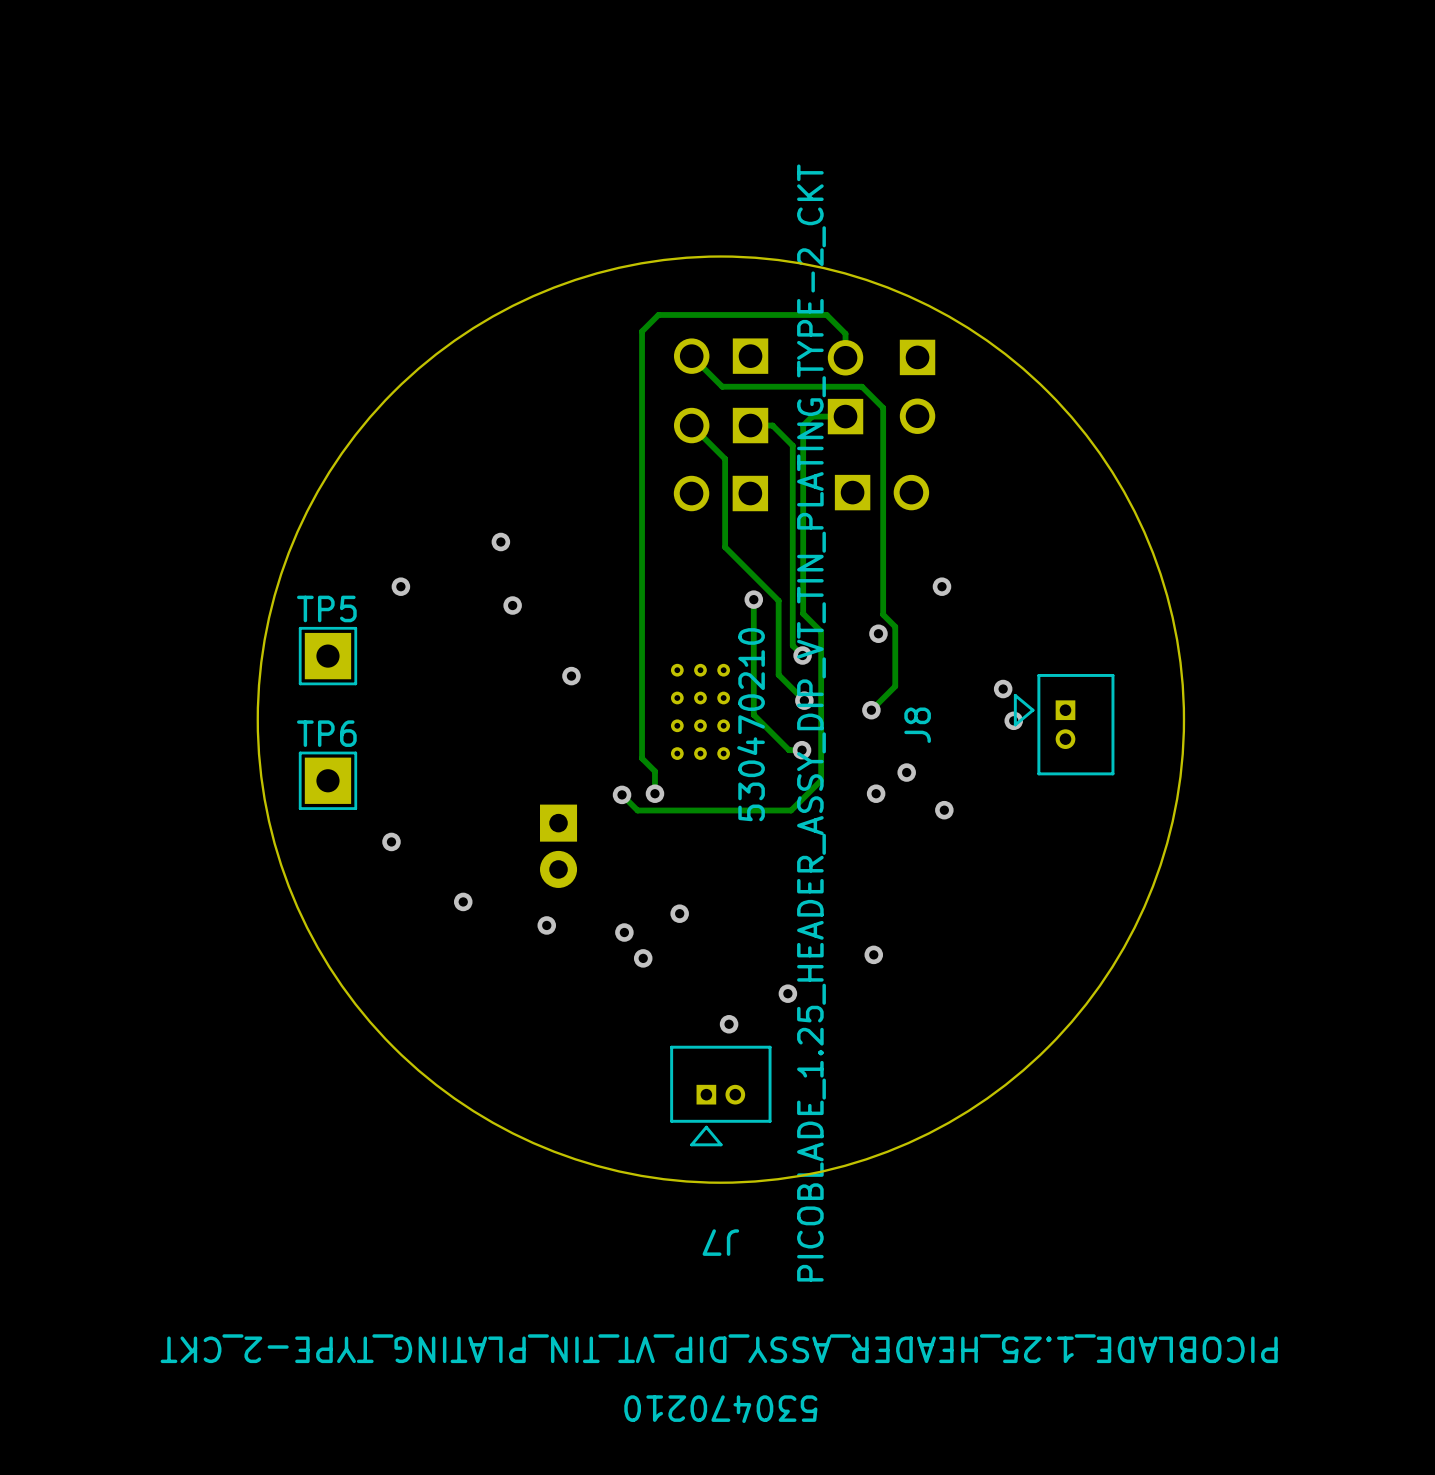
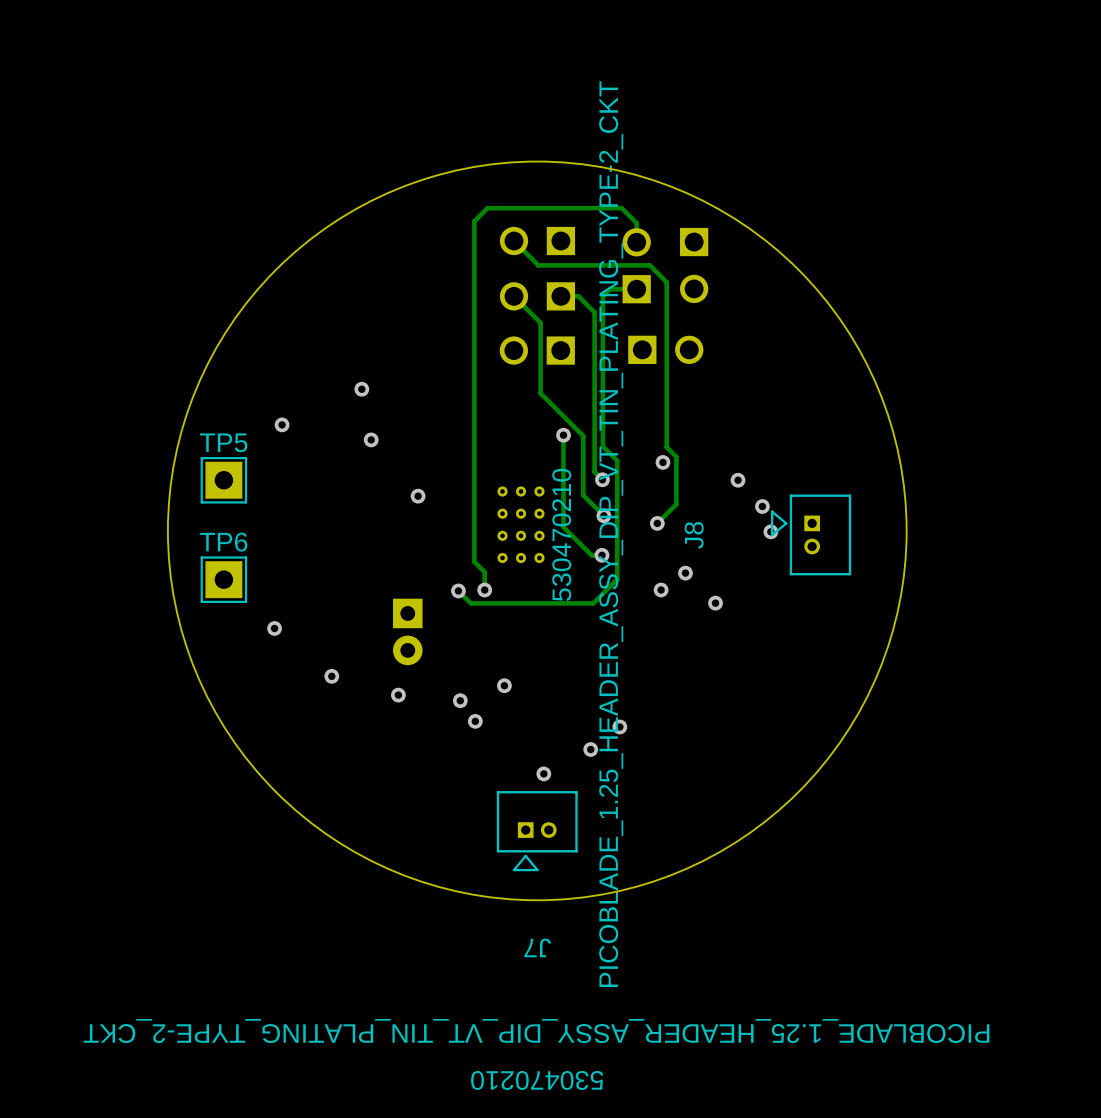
via position: (941, 586) -> (738, 480)
via position: (873, 954) -> (619, 726)

